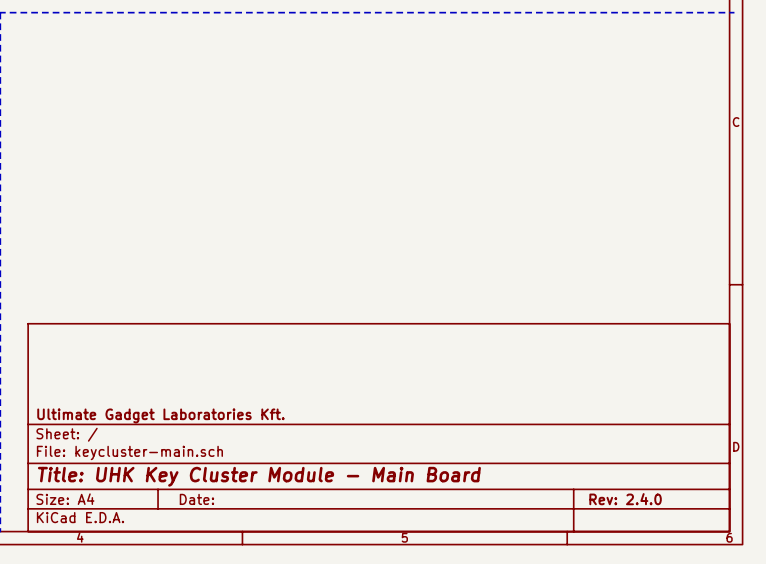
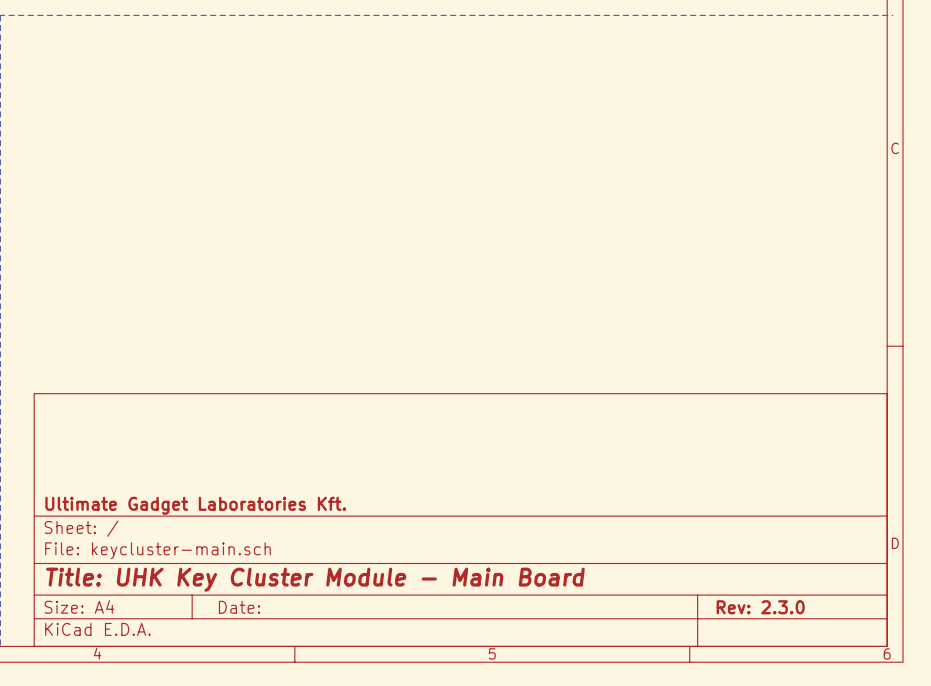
title block: Rev: 2.4.0 (625, 499) -> Rev: 2.3.0 (760, 607)

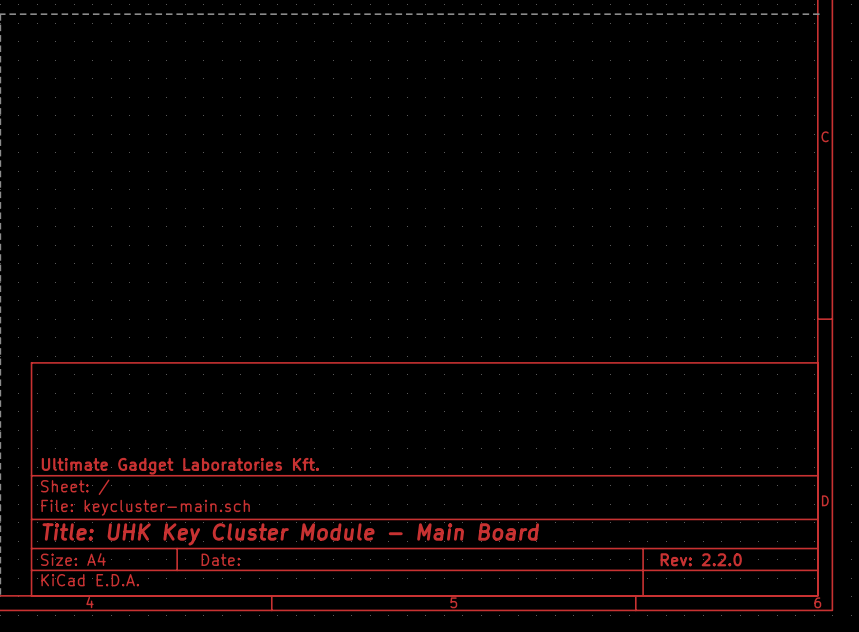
title block: Rev: 2.3.0 (760, 607) -> Rev: 2.2.0 (701, 559)

